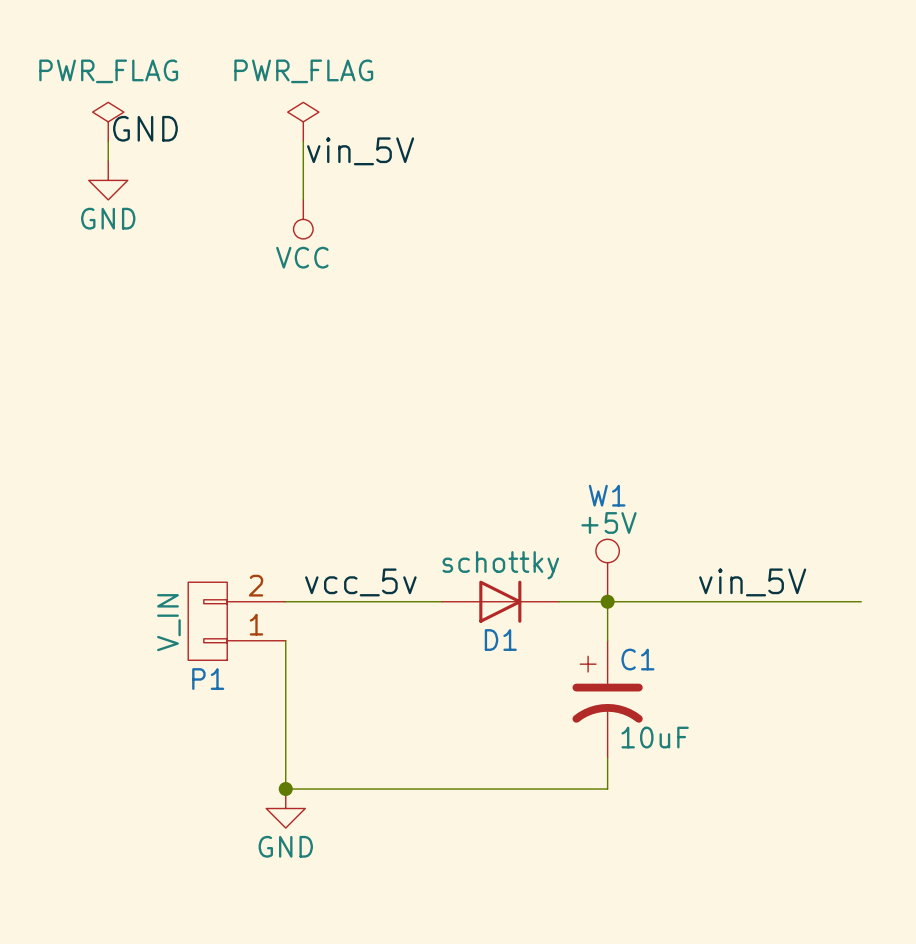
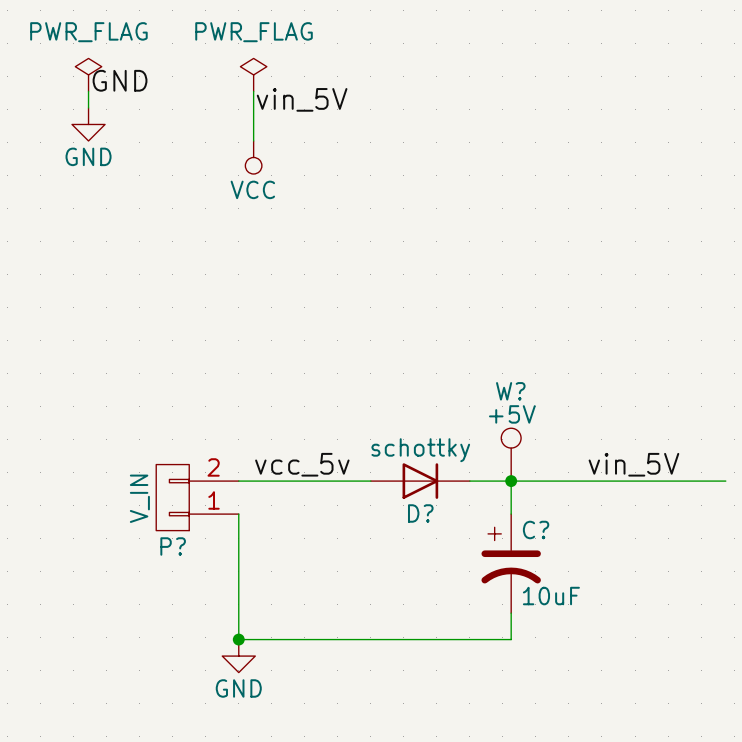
W1 name: W1 (607, 495) -> W? (510, 391)
D1 name: D1 (500, 640) -> D? (420, 513)
C1 name: C1 (637, 659) -> C? (536, 529)
P1 name: P1 (208, 679) -> P? (173, 546)

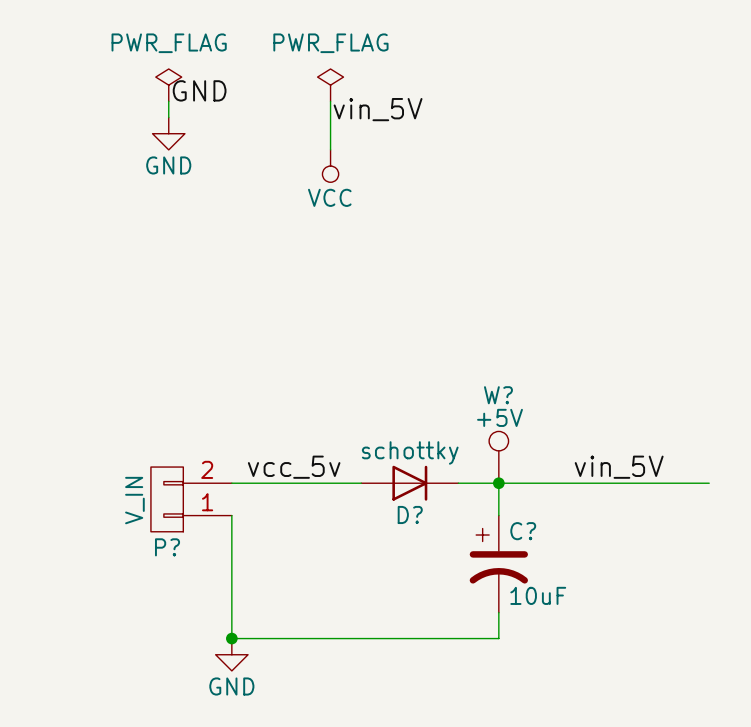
power symbol: PWR_FLAG (88, 74) -> none
power symbol: none -> PWR_FLAG (168, 85)
power symbol: PWR_FLAG (253, 74) -> none
power symbol: none -> PWR_FLAG (330, 85)
label position: GND (120, 80) -> GND (199, 90)
wire: (88, 91) (88, 107) -> (168, 101) (168, 117)
wire: (253, 91) (253, 140) -> (330, 101) (330, 149)
label position: vin_5V (302, 99) -> vin_5V (378, 109)
power symbol position: GND (88, 124) -> GND (168, 133)
power symbol position: VCC (253, 157) -> VCC (330, 166)

